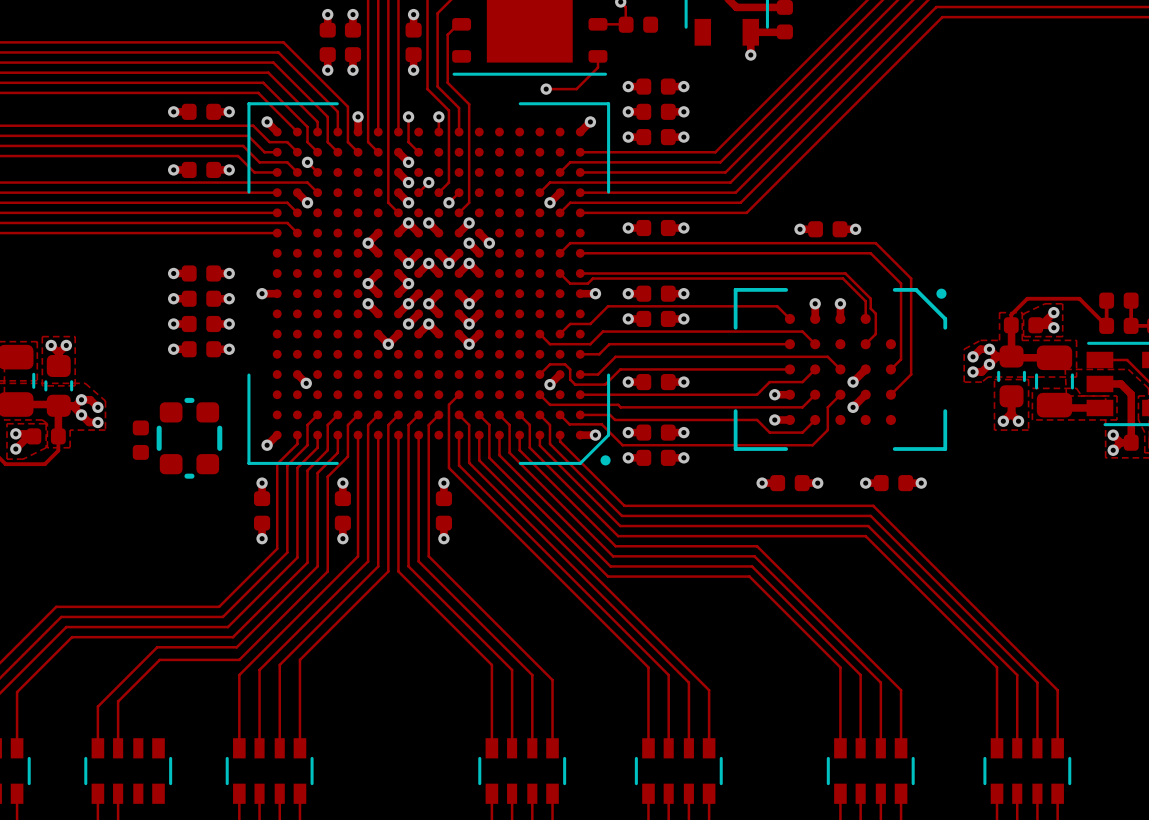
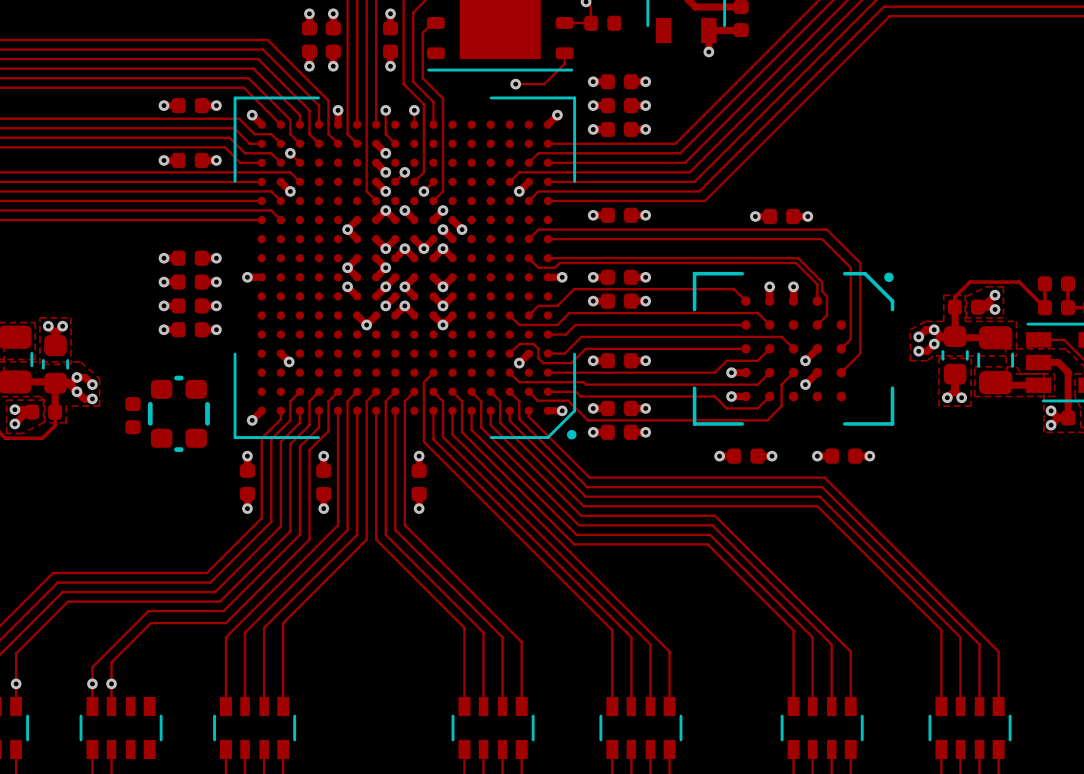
via: none -> (16, 683)
via: none -> (92, 683)
via: none -> (111, 683)

